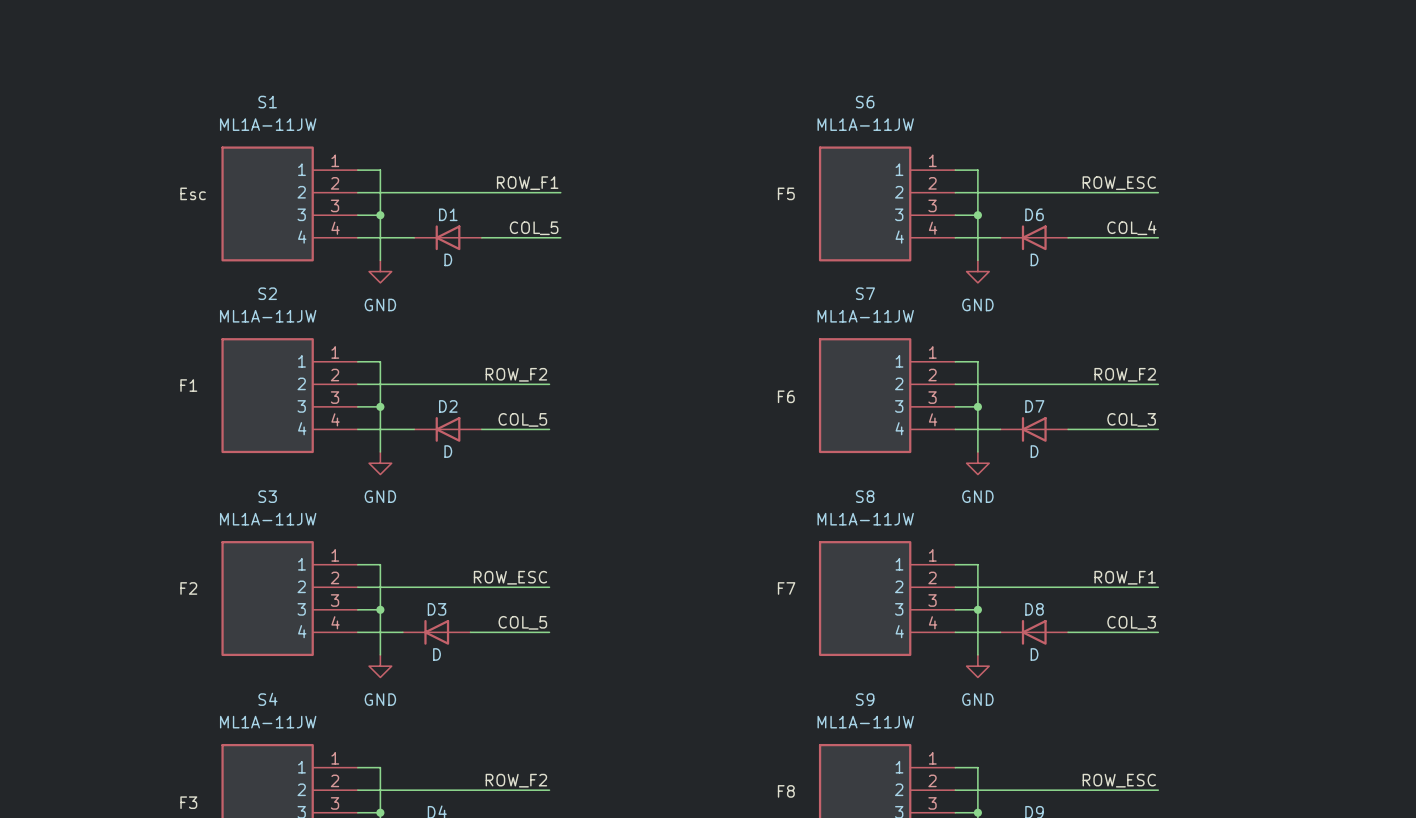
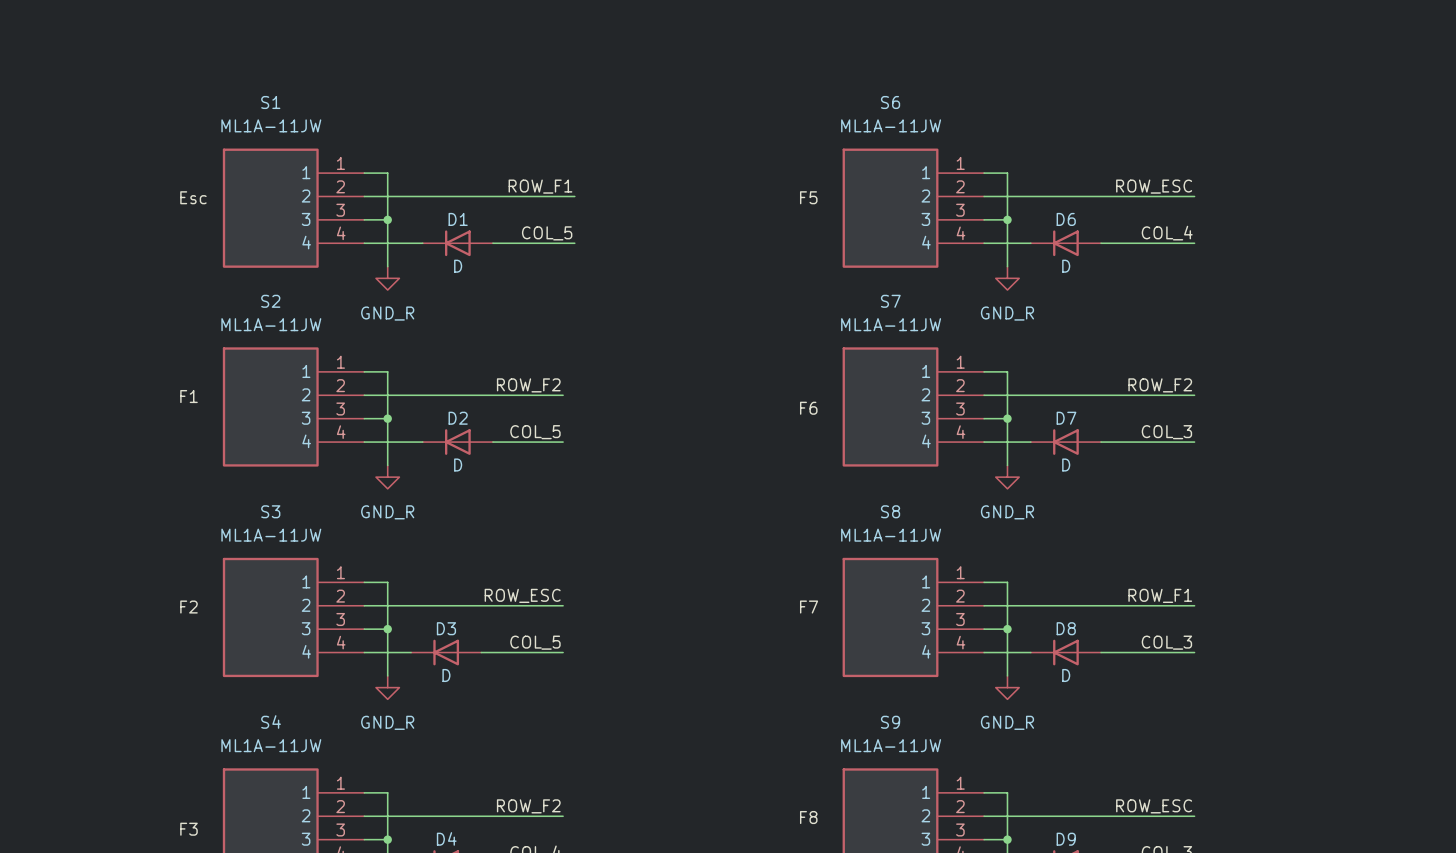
power symbol: GND (380, 271) -> GND_R (387, 278)
power symbol: GND (977, 271) -> GND_R (1007, 278)
power symbol: GND (380, 463) -> GND_R (387, 477)
power symbol: GND (977, 463) -> GND_R (1007, 477)
power symbol: GND (380, 666) -> GND_R (387, 687)
power symbol: GND (977, 666) -> GND_R (1007, 687)

